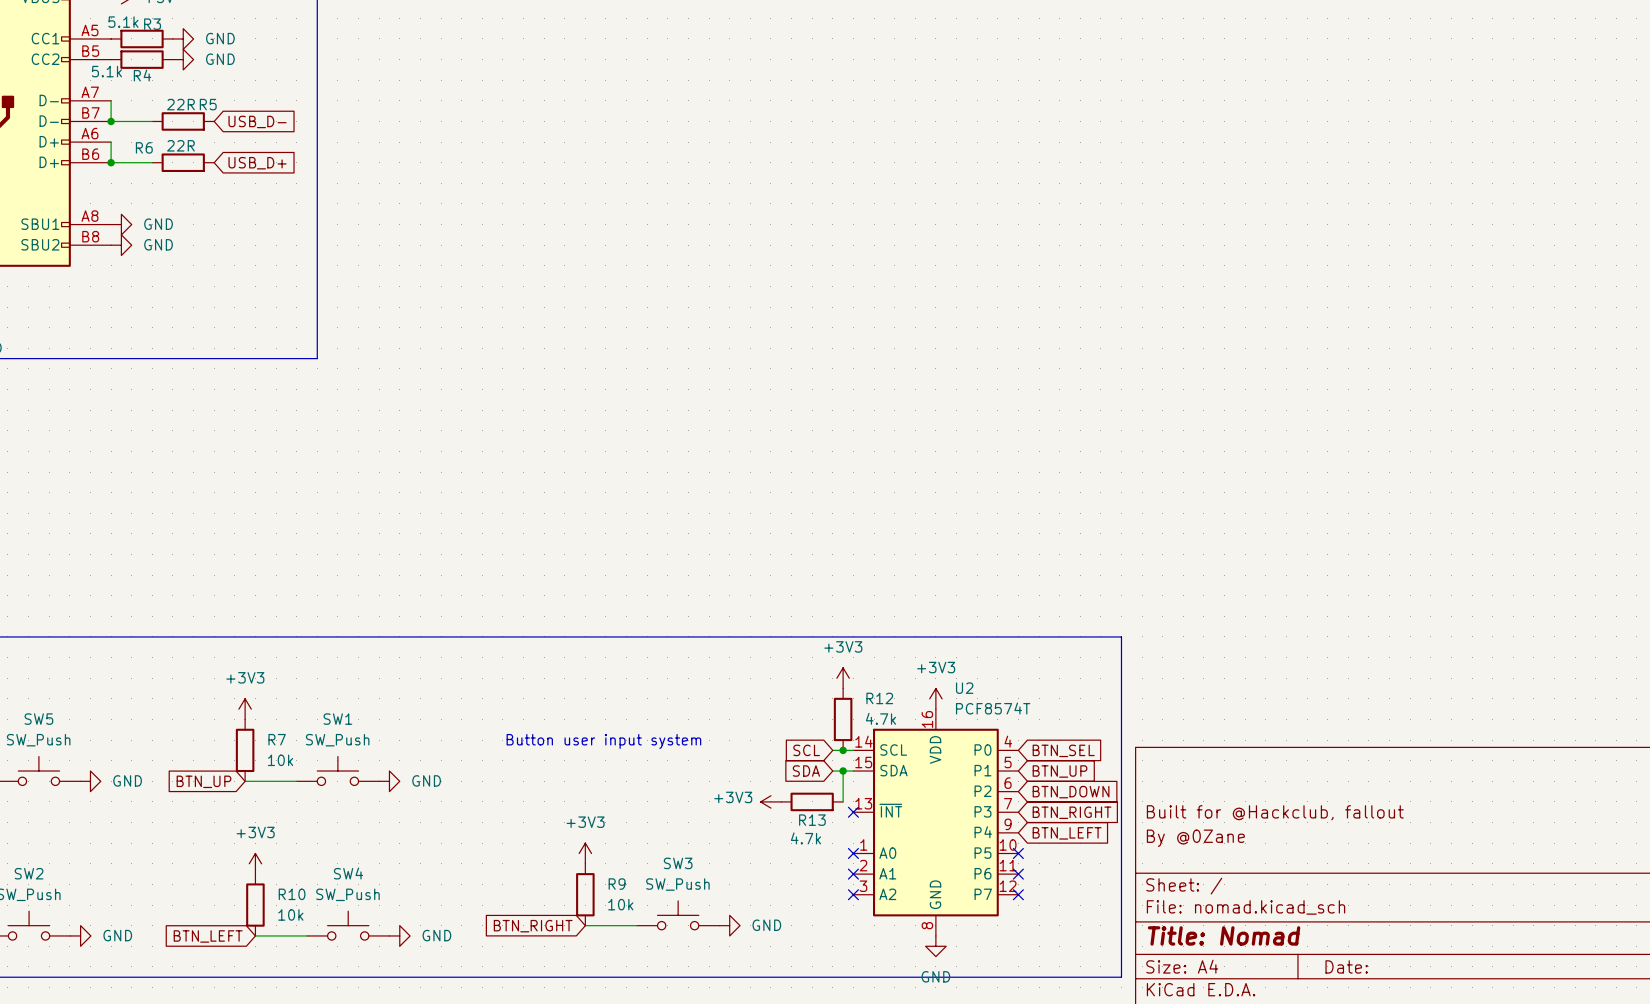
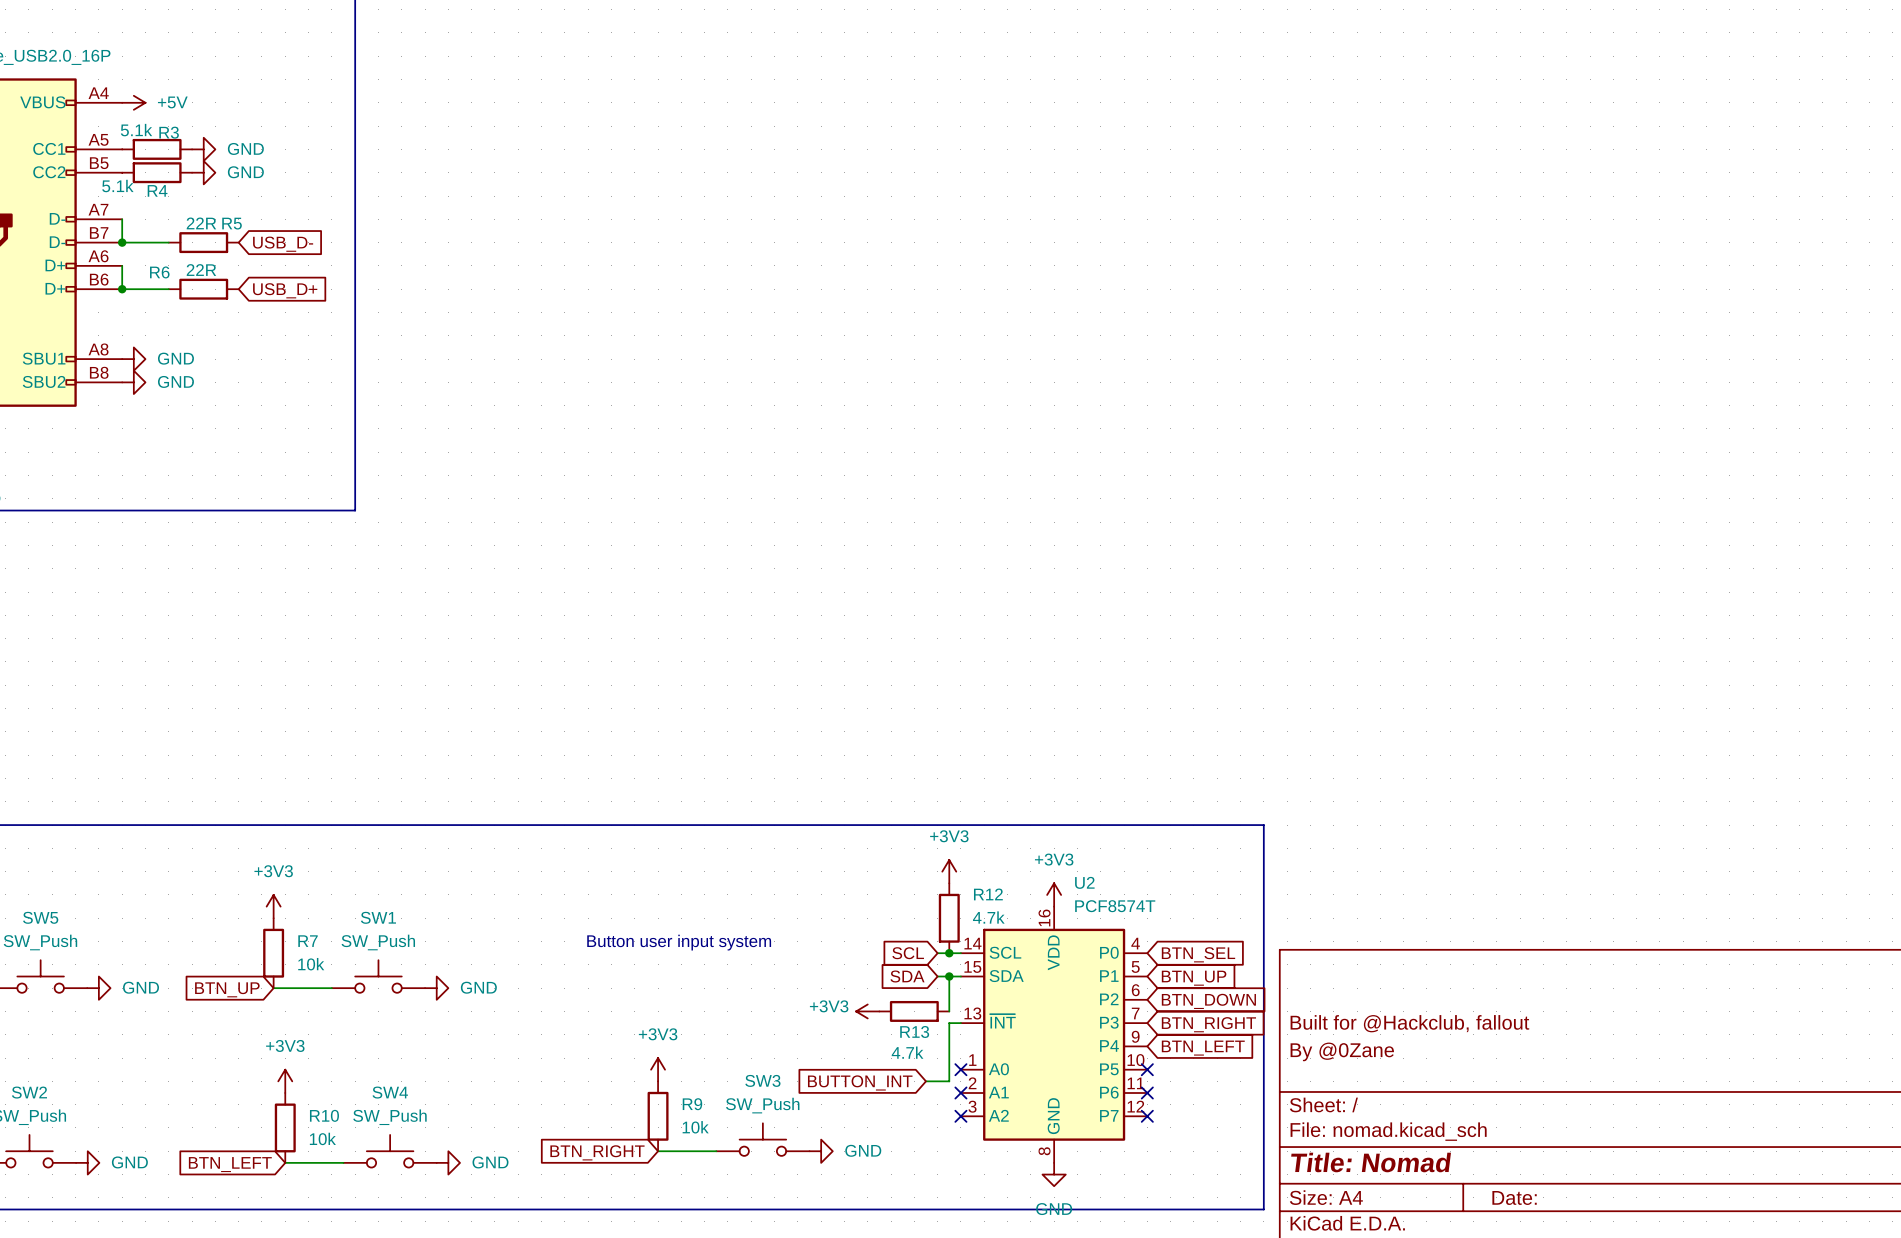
wire: none -> (960, 1023) (949, 1023) (949, 1081) (925, 1081)
no-connect mark: (853, 812) -> none
global label: none -> BUTTON_INT (860, 1082)

